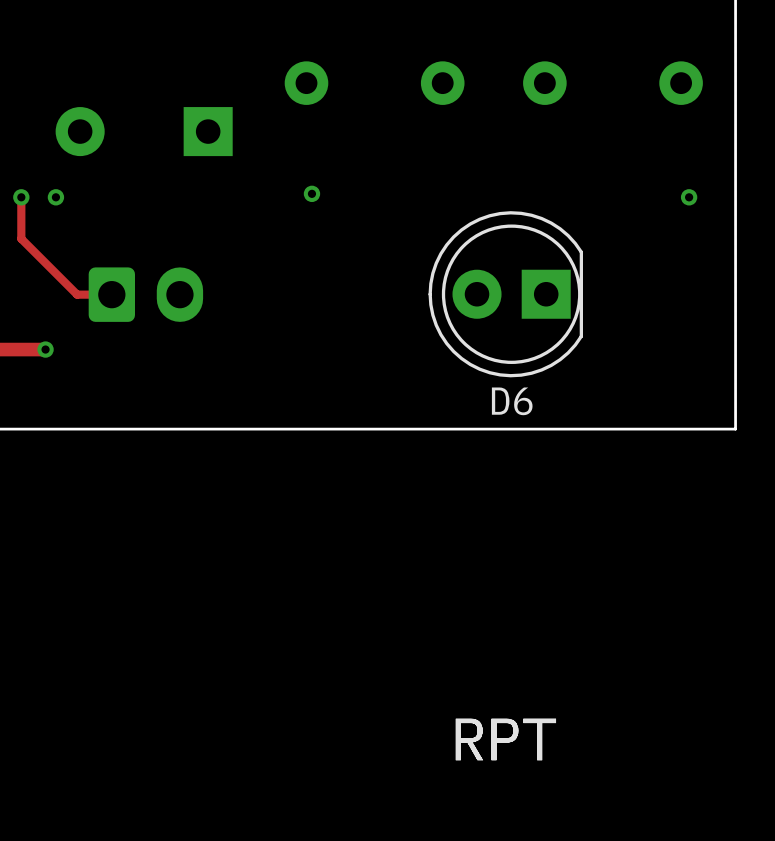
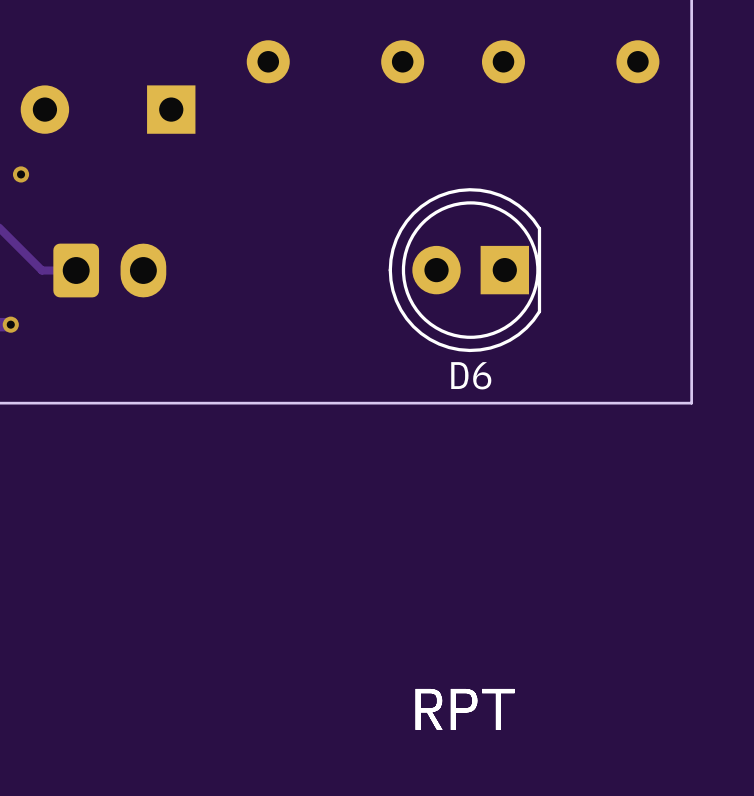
via: (311, 193) -> none
via: (689, 197) -> none

